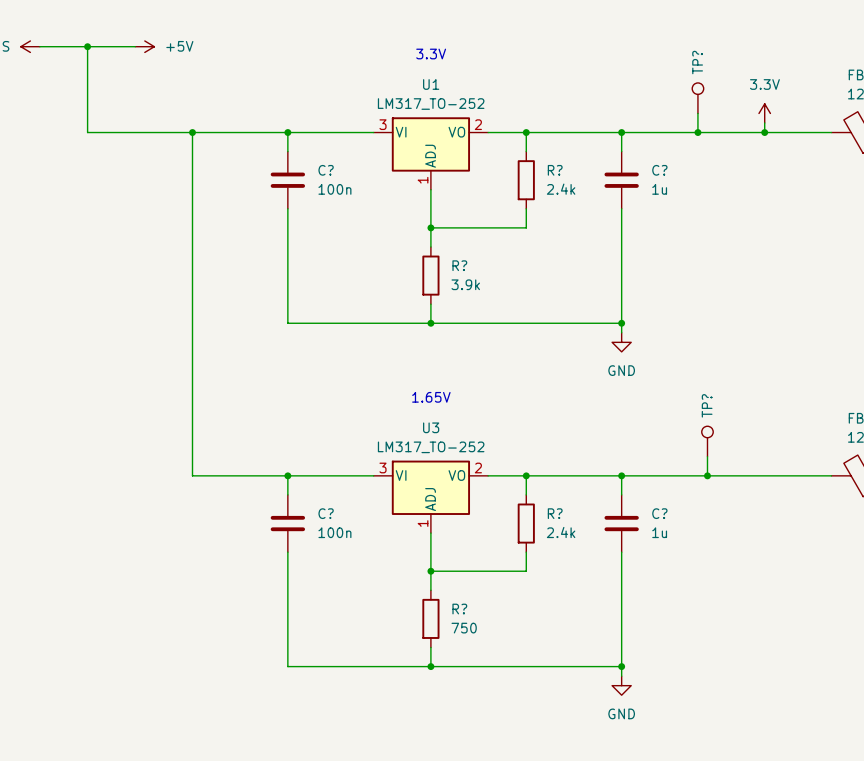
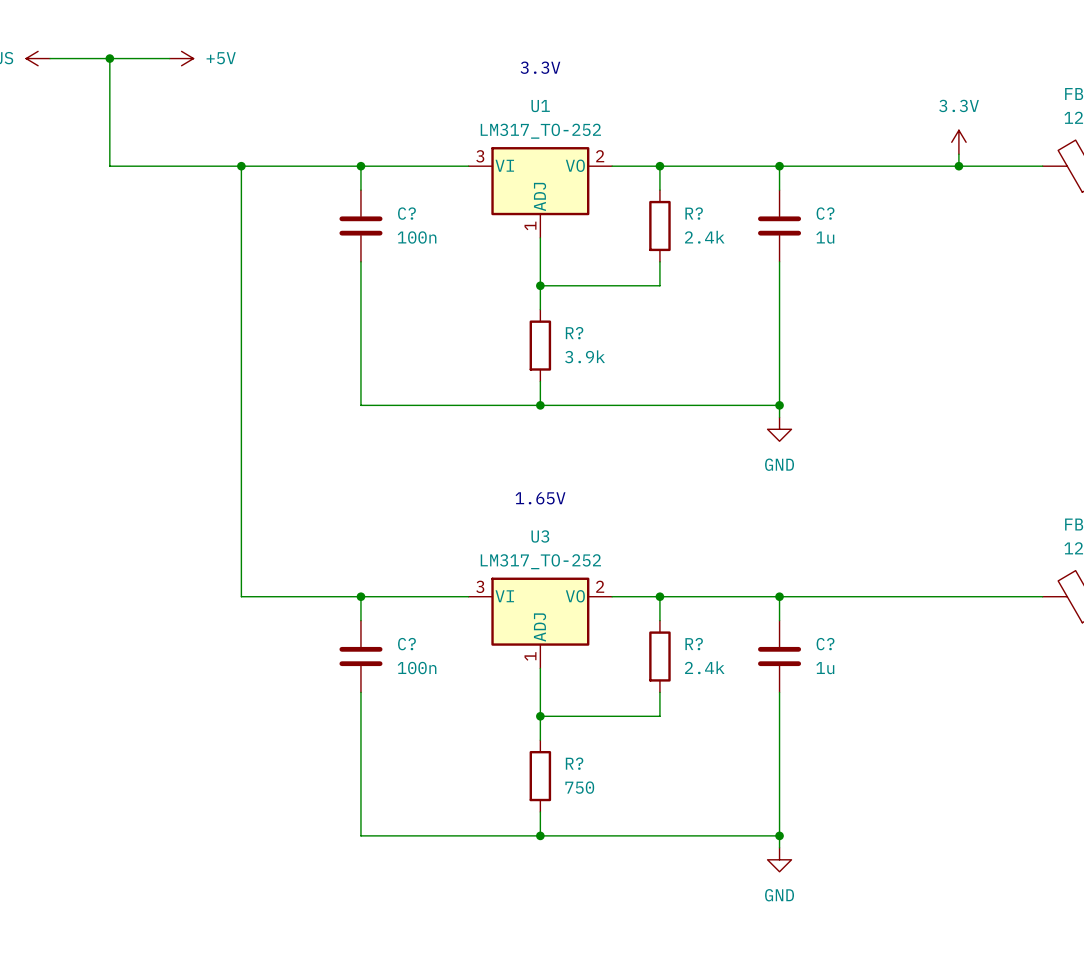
TP?: (697, 98) -> none
wire: (697, 113) (697, 132) -> none
junction: (697, 132) -> none
TP?: (707, 441) -> none
wire: (707, 456) (707, 475) -> none
junction: (707, 475) -> none

